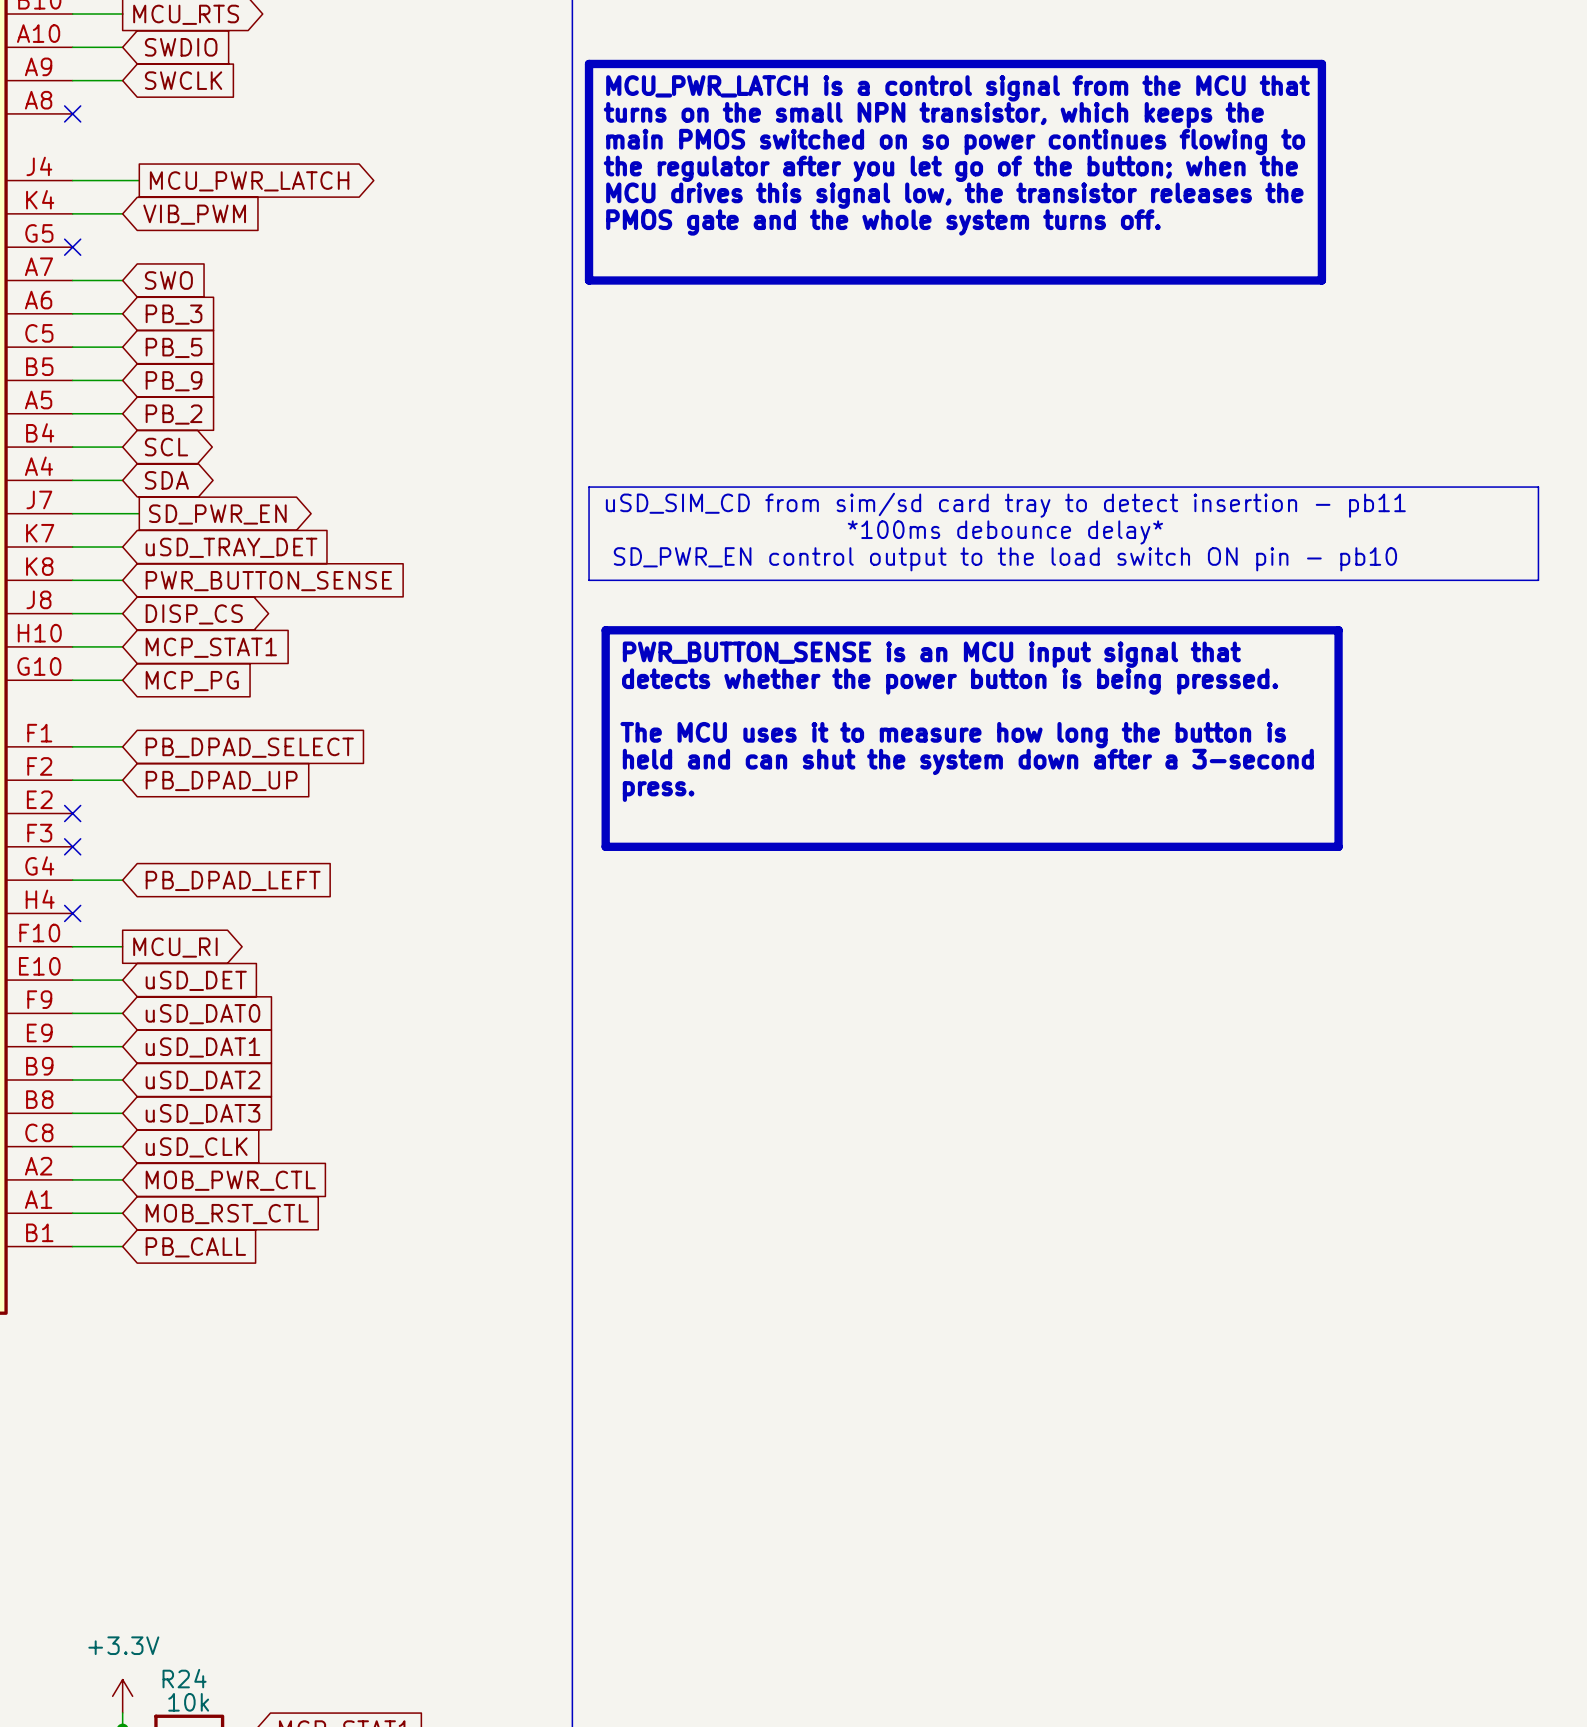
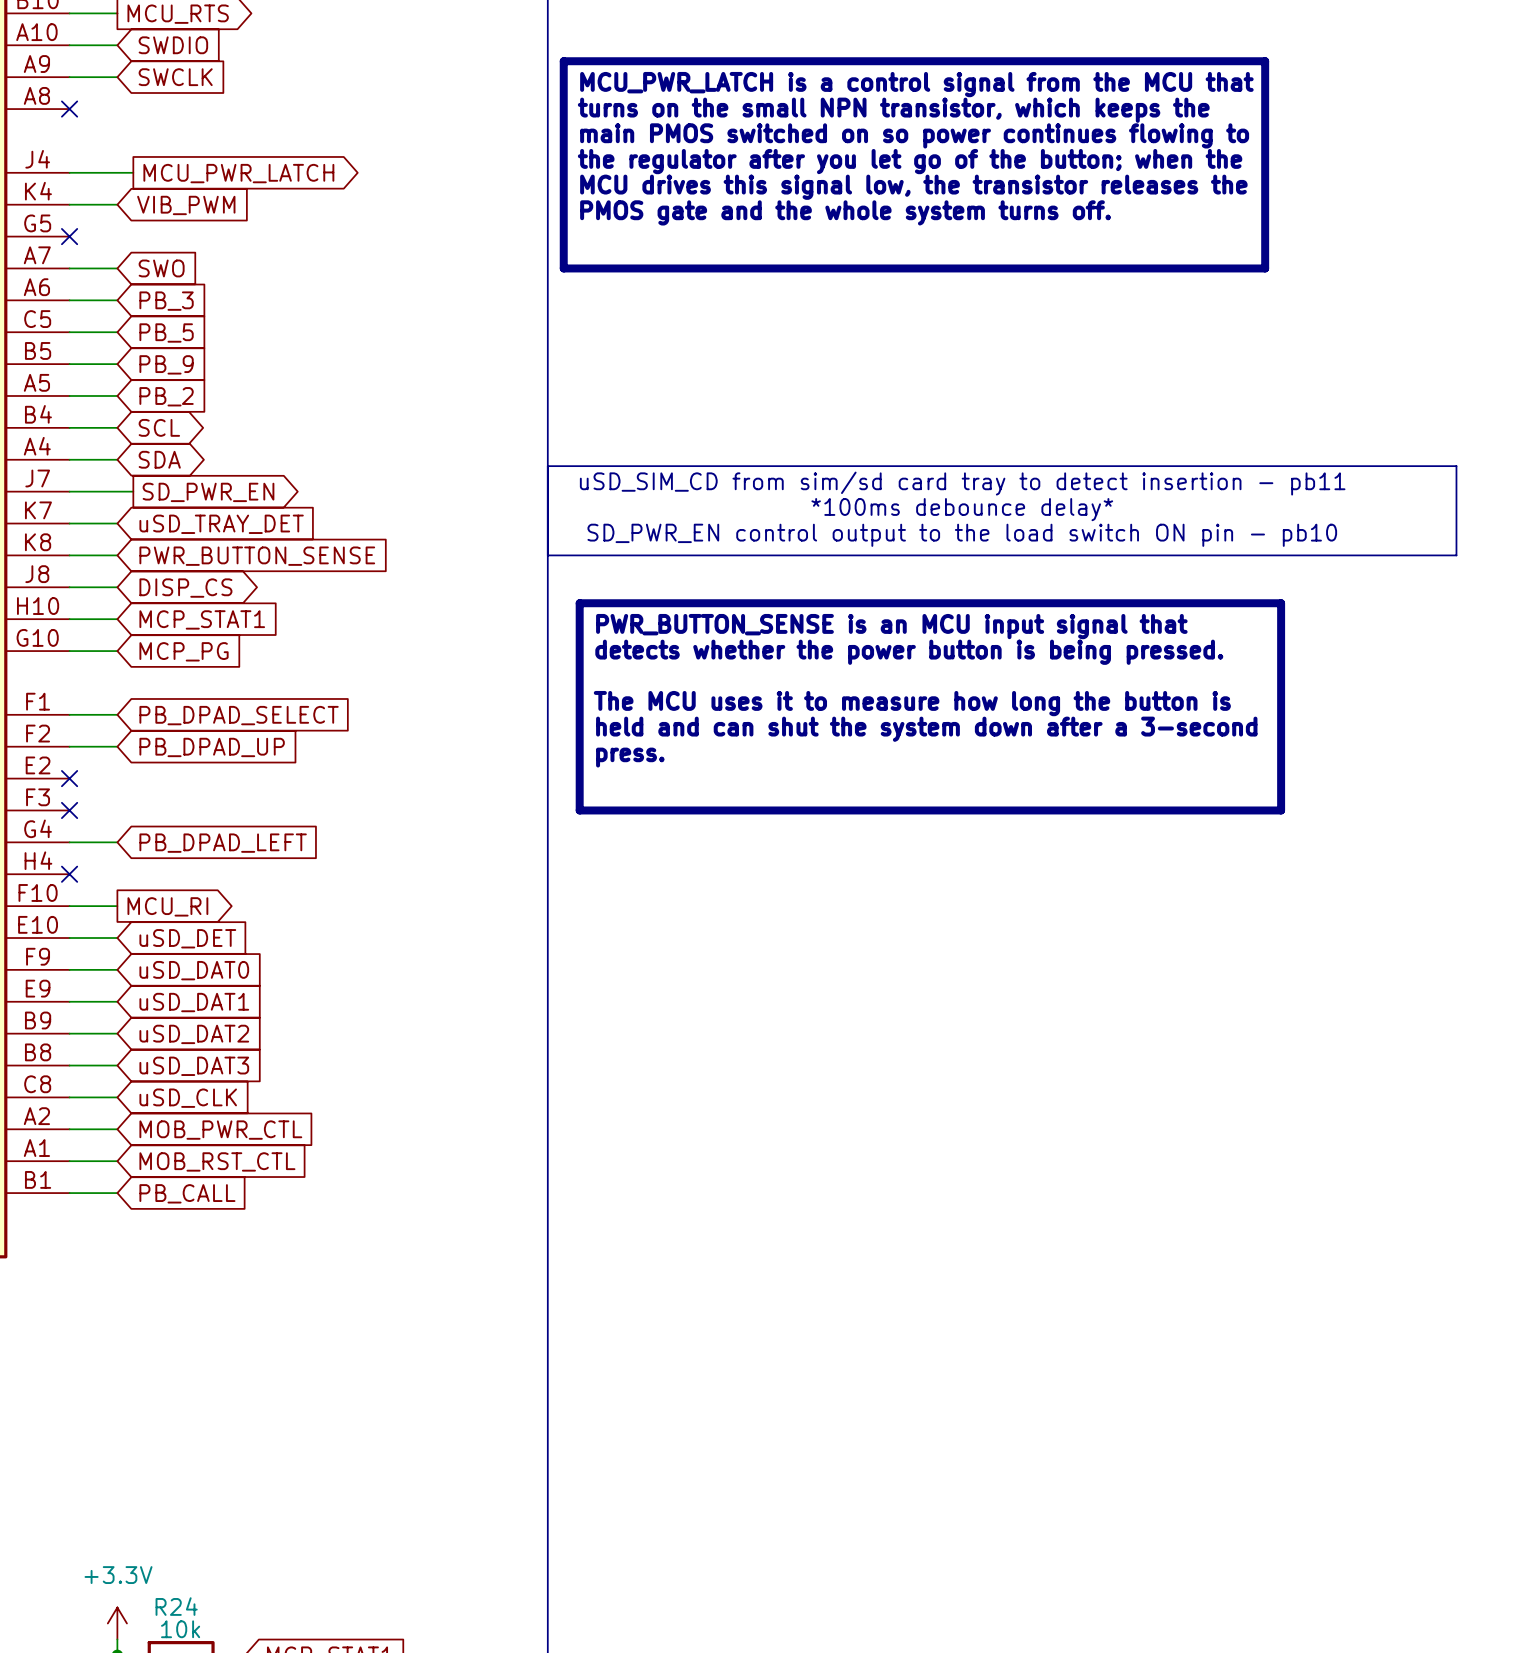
line: (589, 487) (589, 580) -> (563, 466) (547, 466) (547, 555) (563, 555)
line: (1521, 487) (1538, 487) (1538, 580) (1521, 580) -> (1456, 466) (1456, 555)

